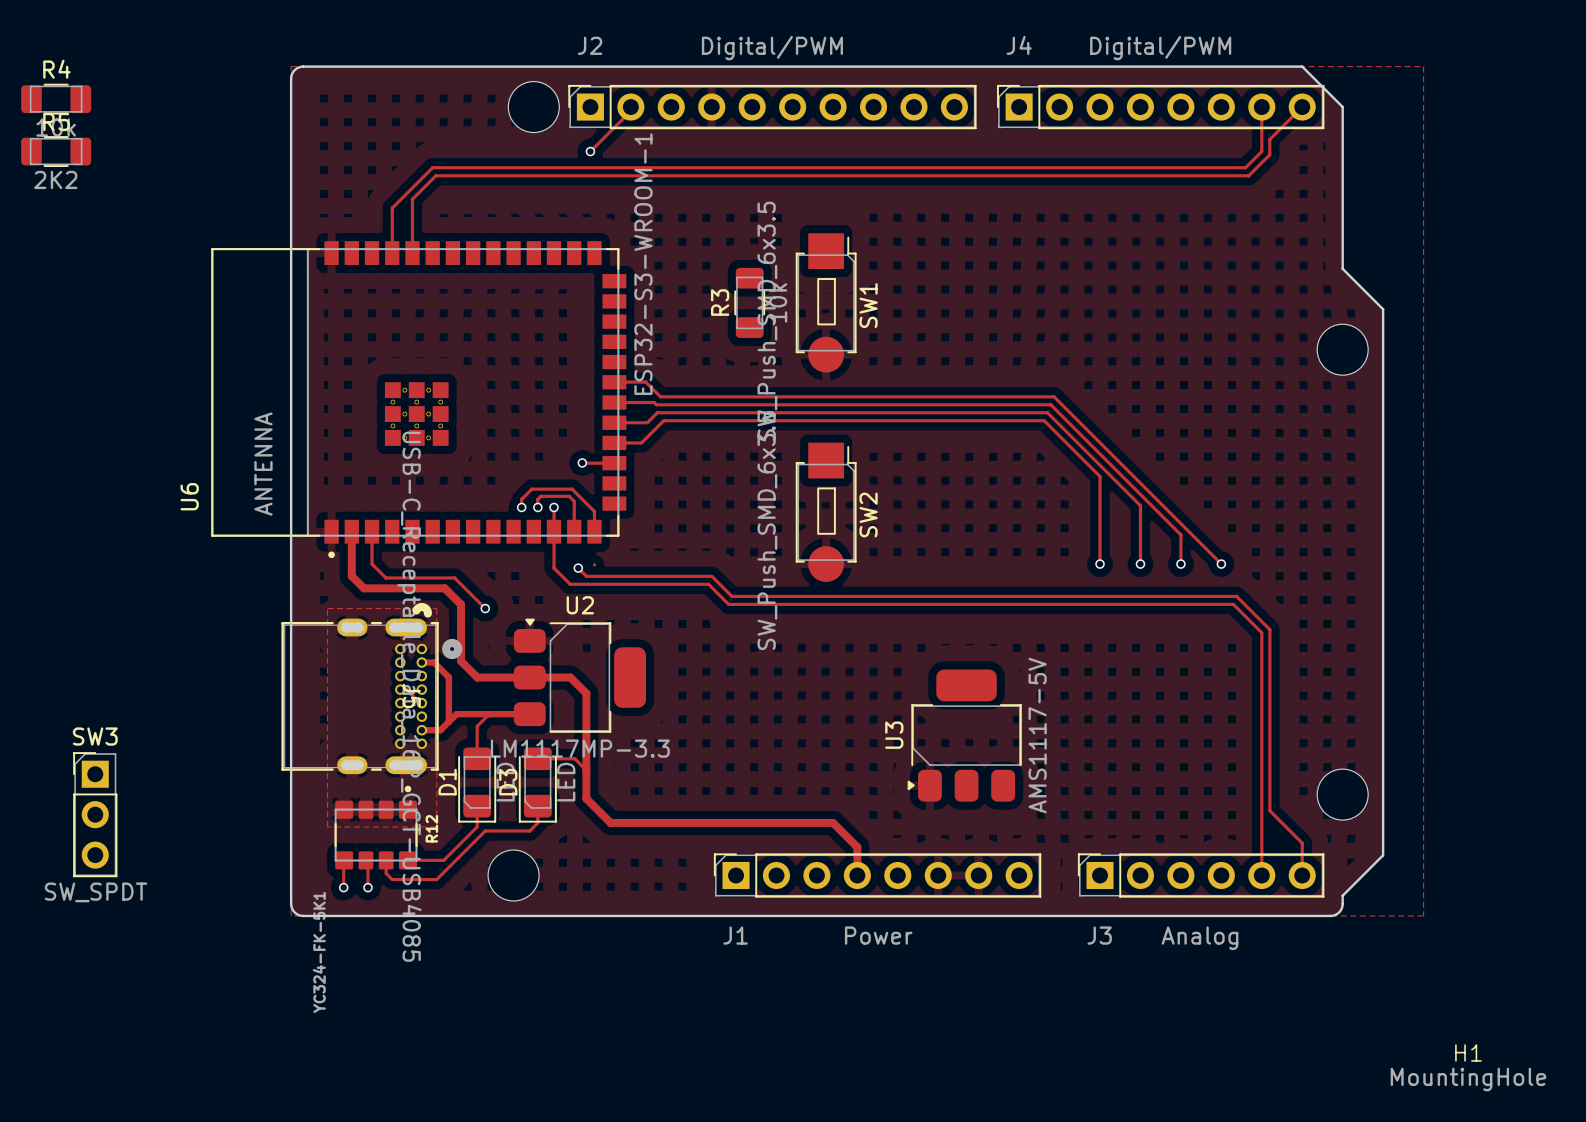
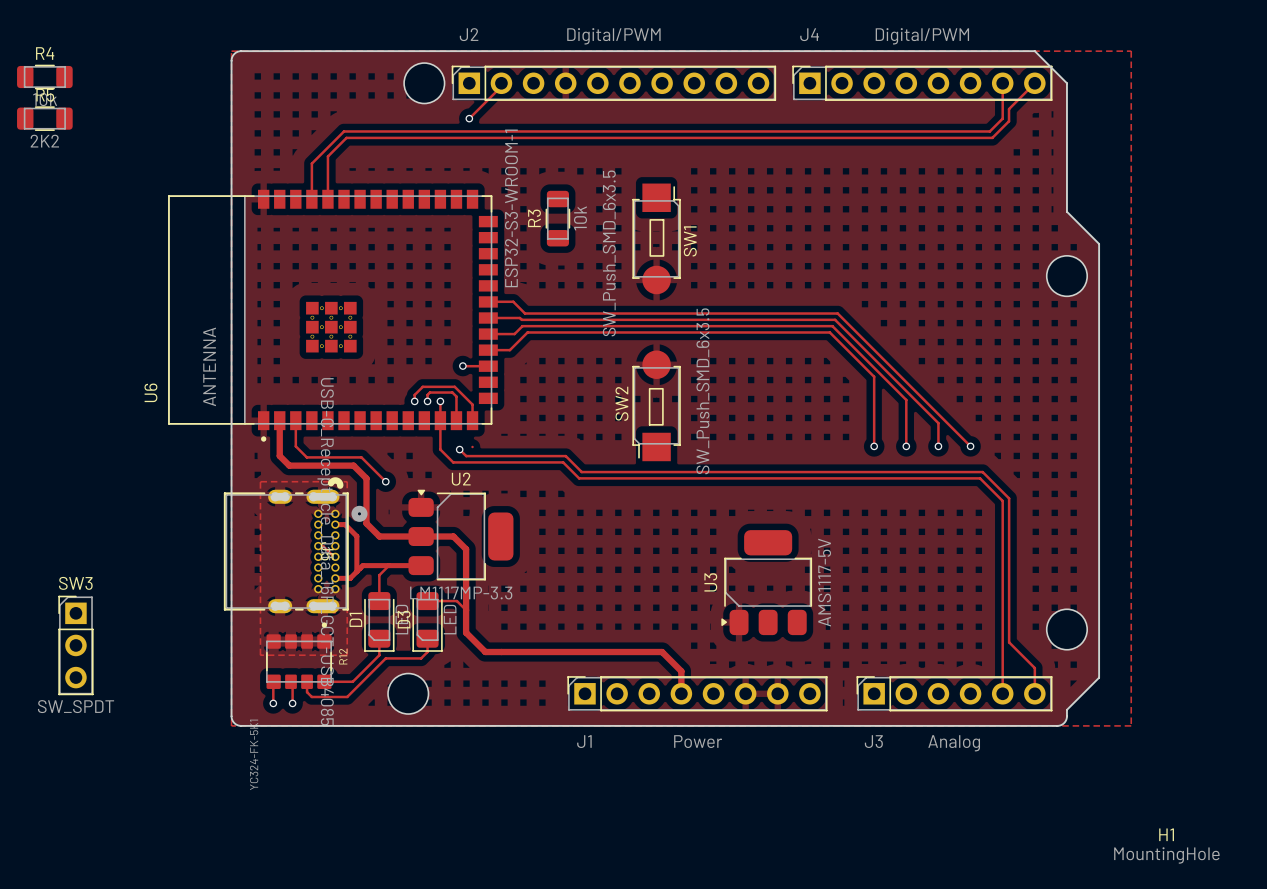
R3 position: (749, 302) -> (557, 218)
SW2 rotation: 0° (826, 512) -> 180° (656, 405)

